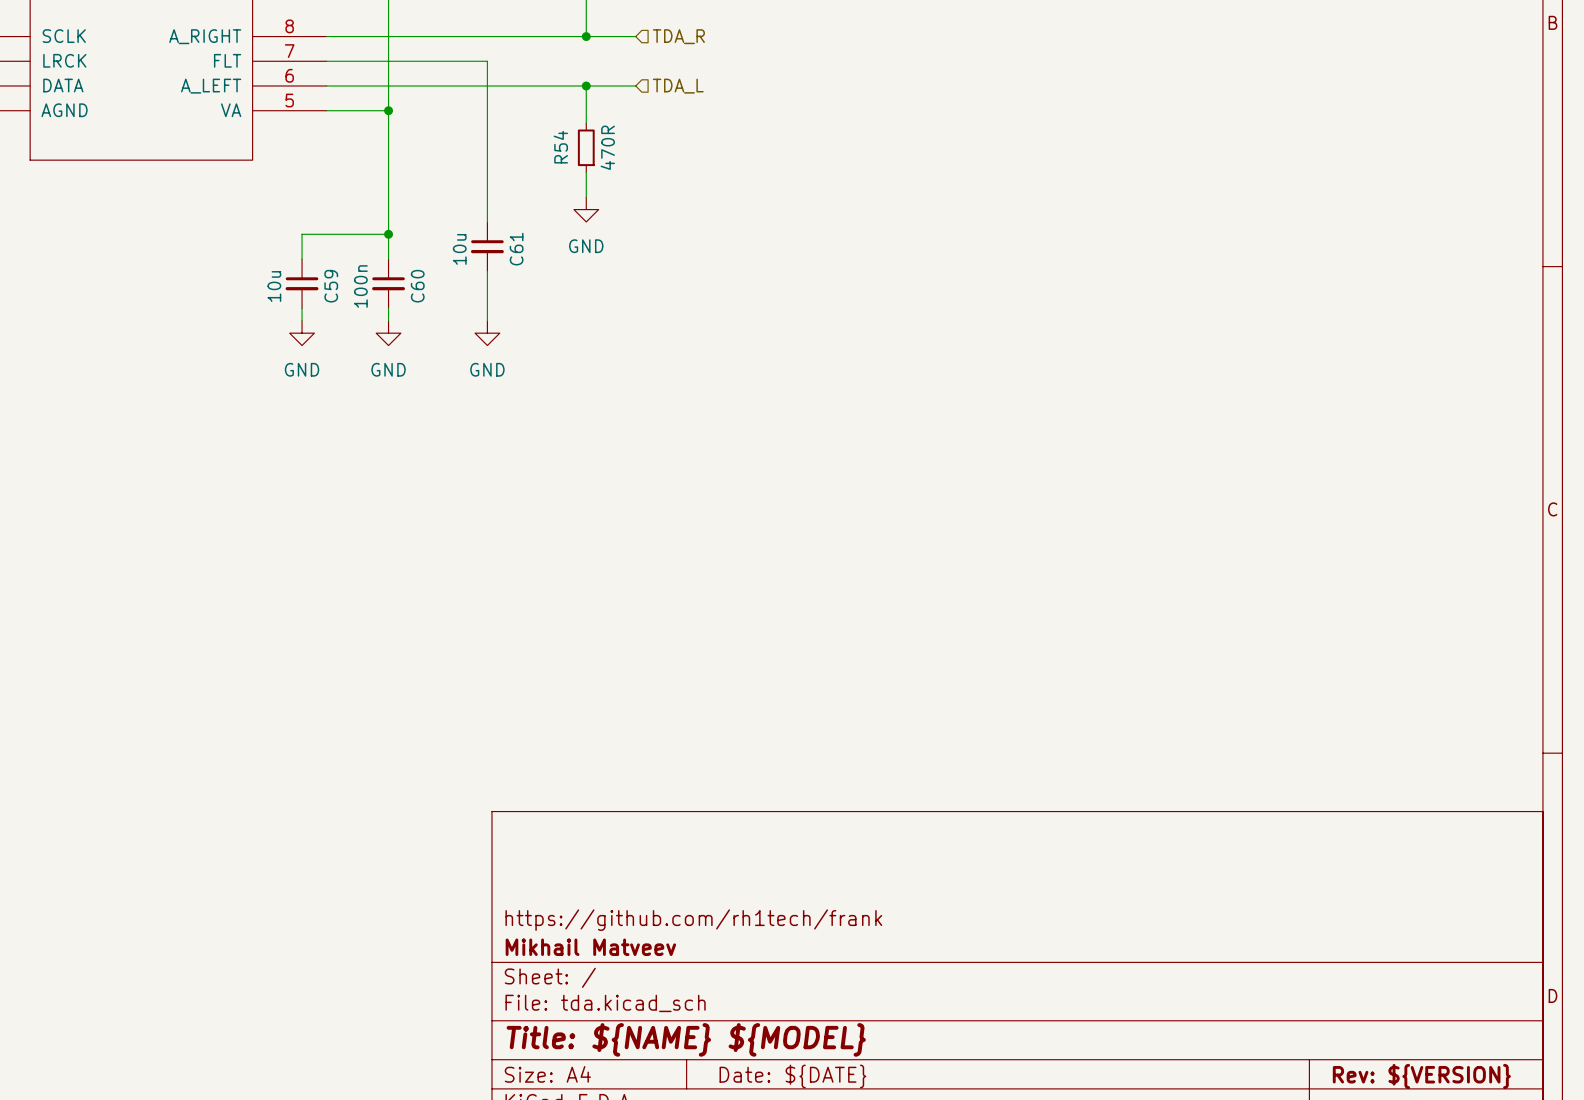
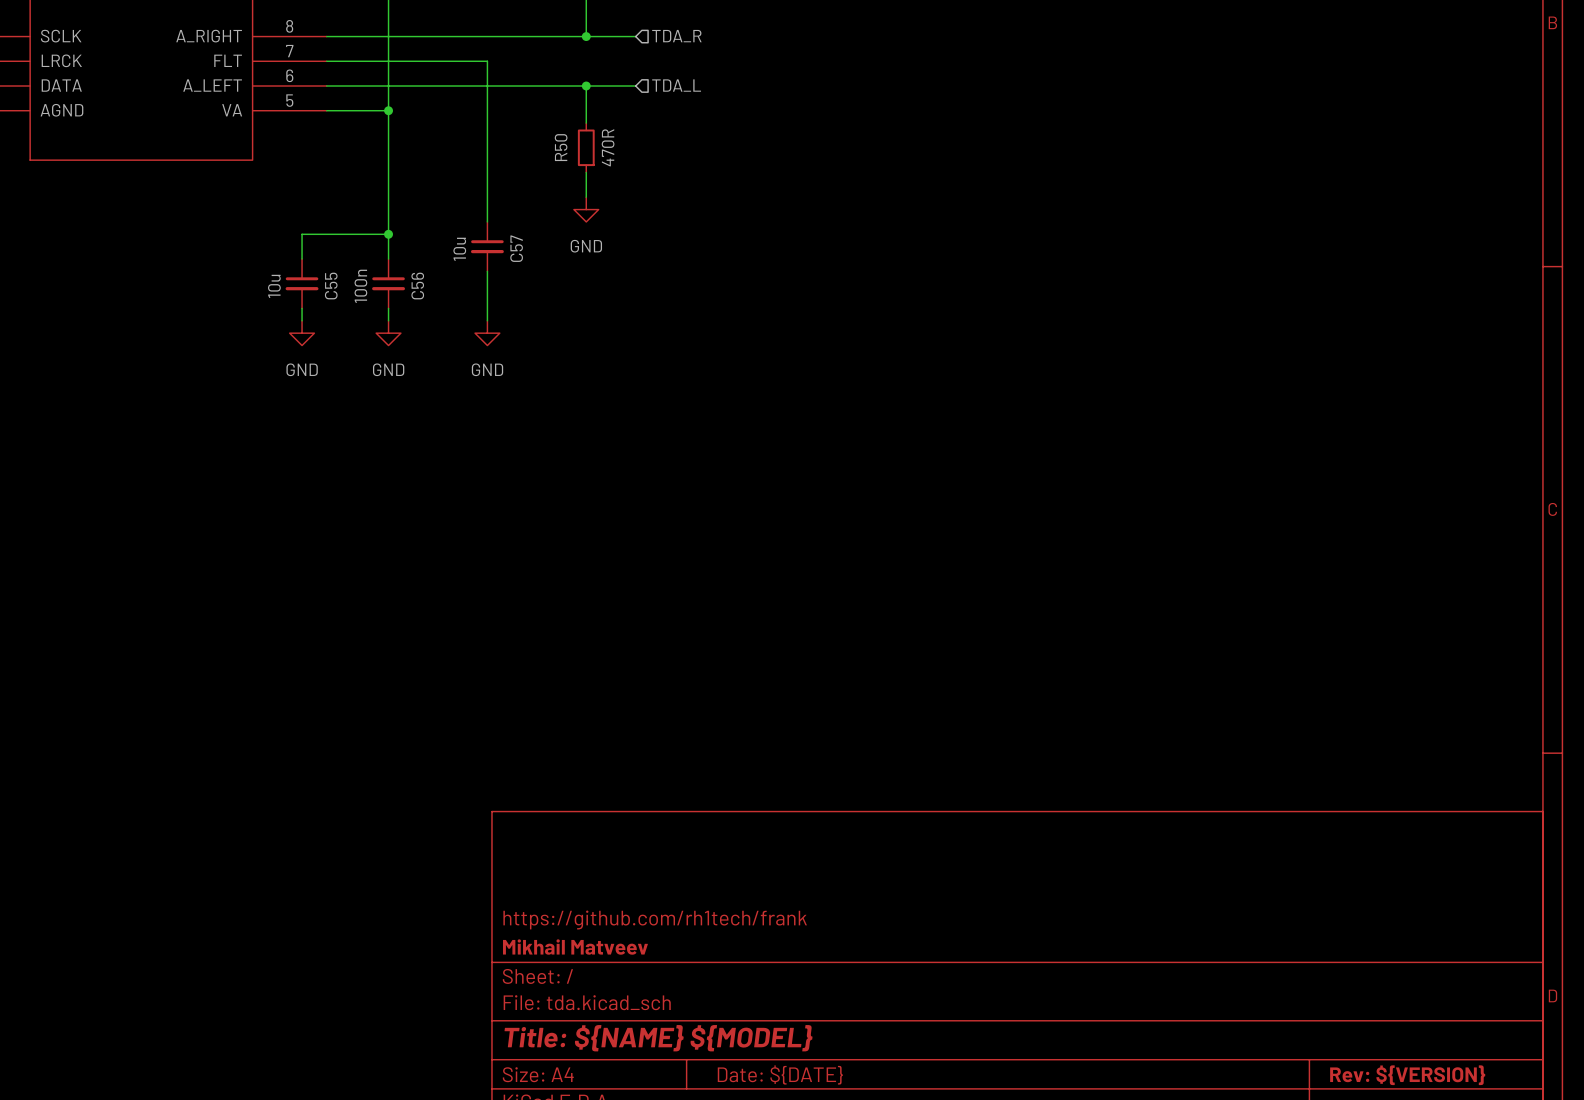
R54 name: R54 (560, 147) -> R50 (561, 147)
C61 name: C61 (516, 249) -> C57 (516, 248)
C59 name: C59 (331, 286) -> C55 (331, 286)
C60 name: C60 (417, 286) -> C56 (417, 286)

